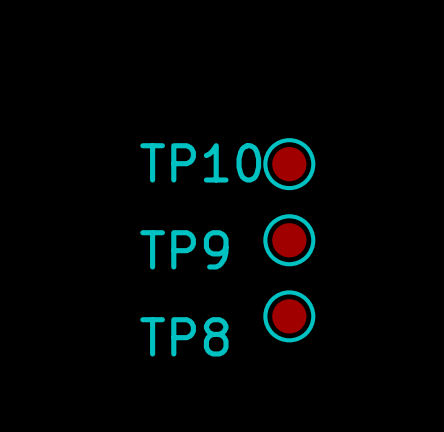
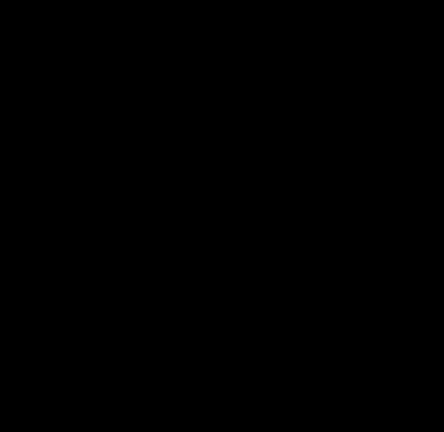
TP10: (289, 164) -> none
TP9: (289, 240) -> none
TP8: (289, 316) -> none

